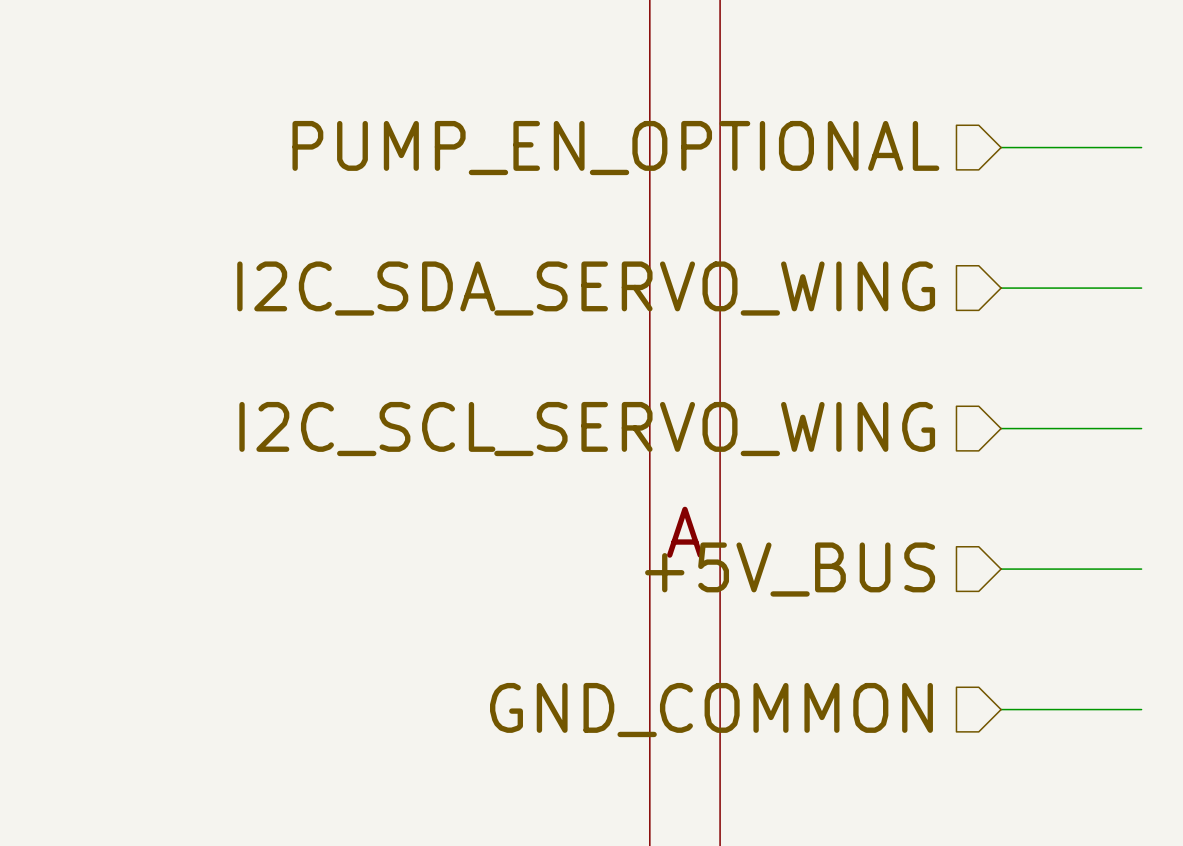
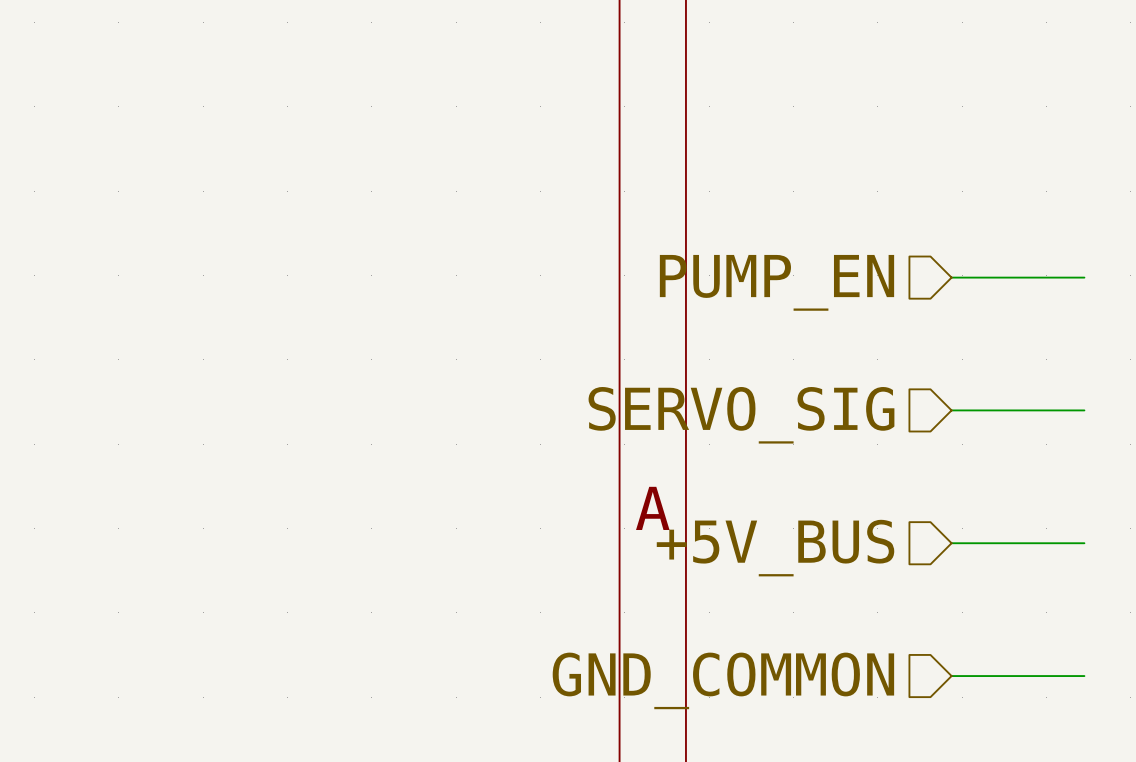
wire: (1001, 147) (1141, 147) -> none
hierarchical label: PUMP_EN_OPTIONAL (615, 148) -> none
hierarchical label: I2C_SDA_SERVO_WING (586, 288) -> PUMP_EN (776, 282)
hierarchical label: I2C_SCL_SERVO_WING (587, 429) -> SERVO_SIG (741, 415)

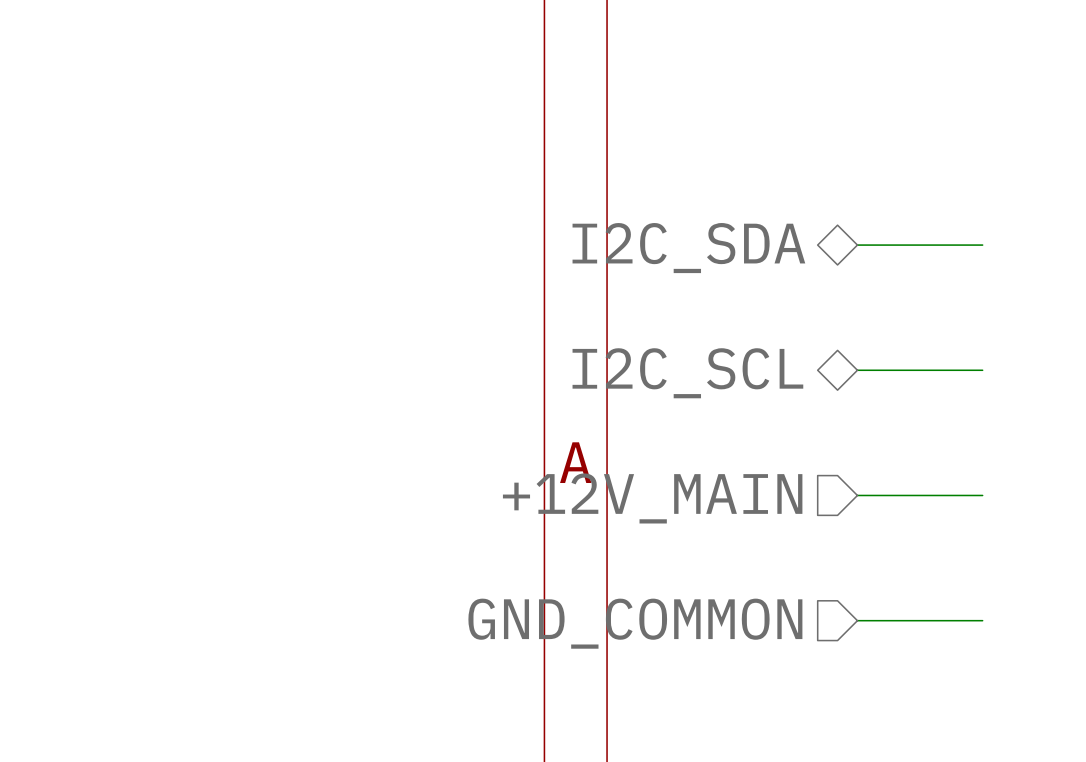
hierarchical label shape: input (776, 282) -> bidirectional (688, 248)
hierarchical label: PUMP_EN (776, 282) -> I2C_SDA (688, 248)
hierarchical label shape: input (741, 415) -> bidirectional (687, 373)
hierarchical label: SERVO_SIG (741, 415) -> I2C_SCL (687, 373)
hierarchical label: +5V_BUS (775, 548) -> +12V_MAIN (652, 498)

